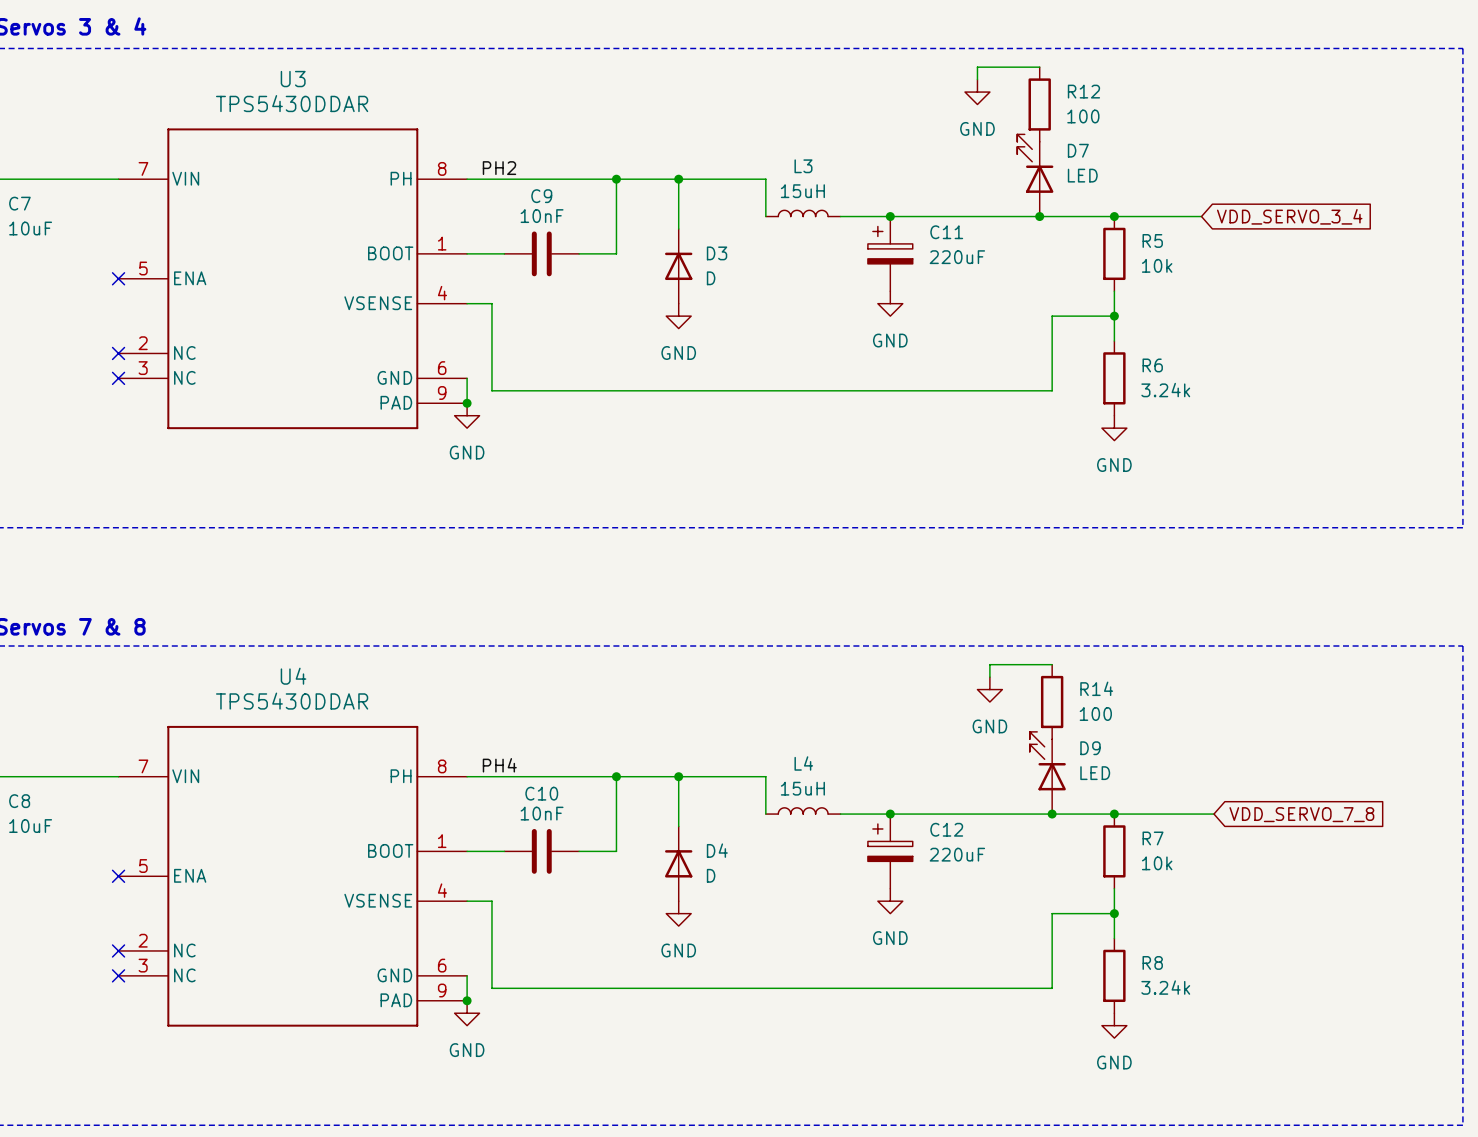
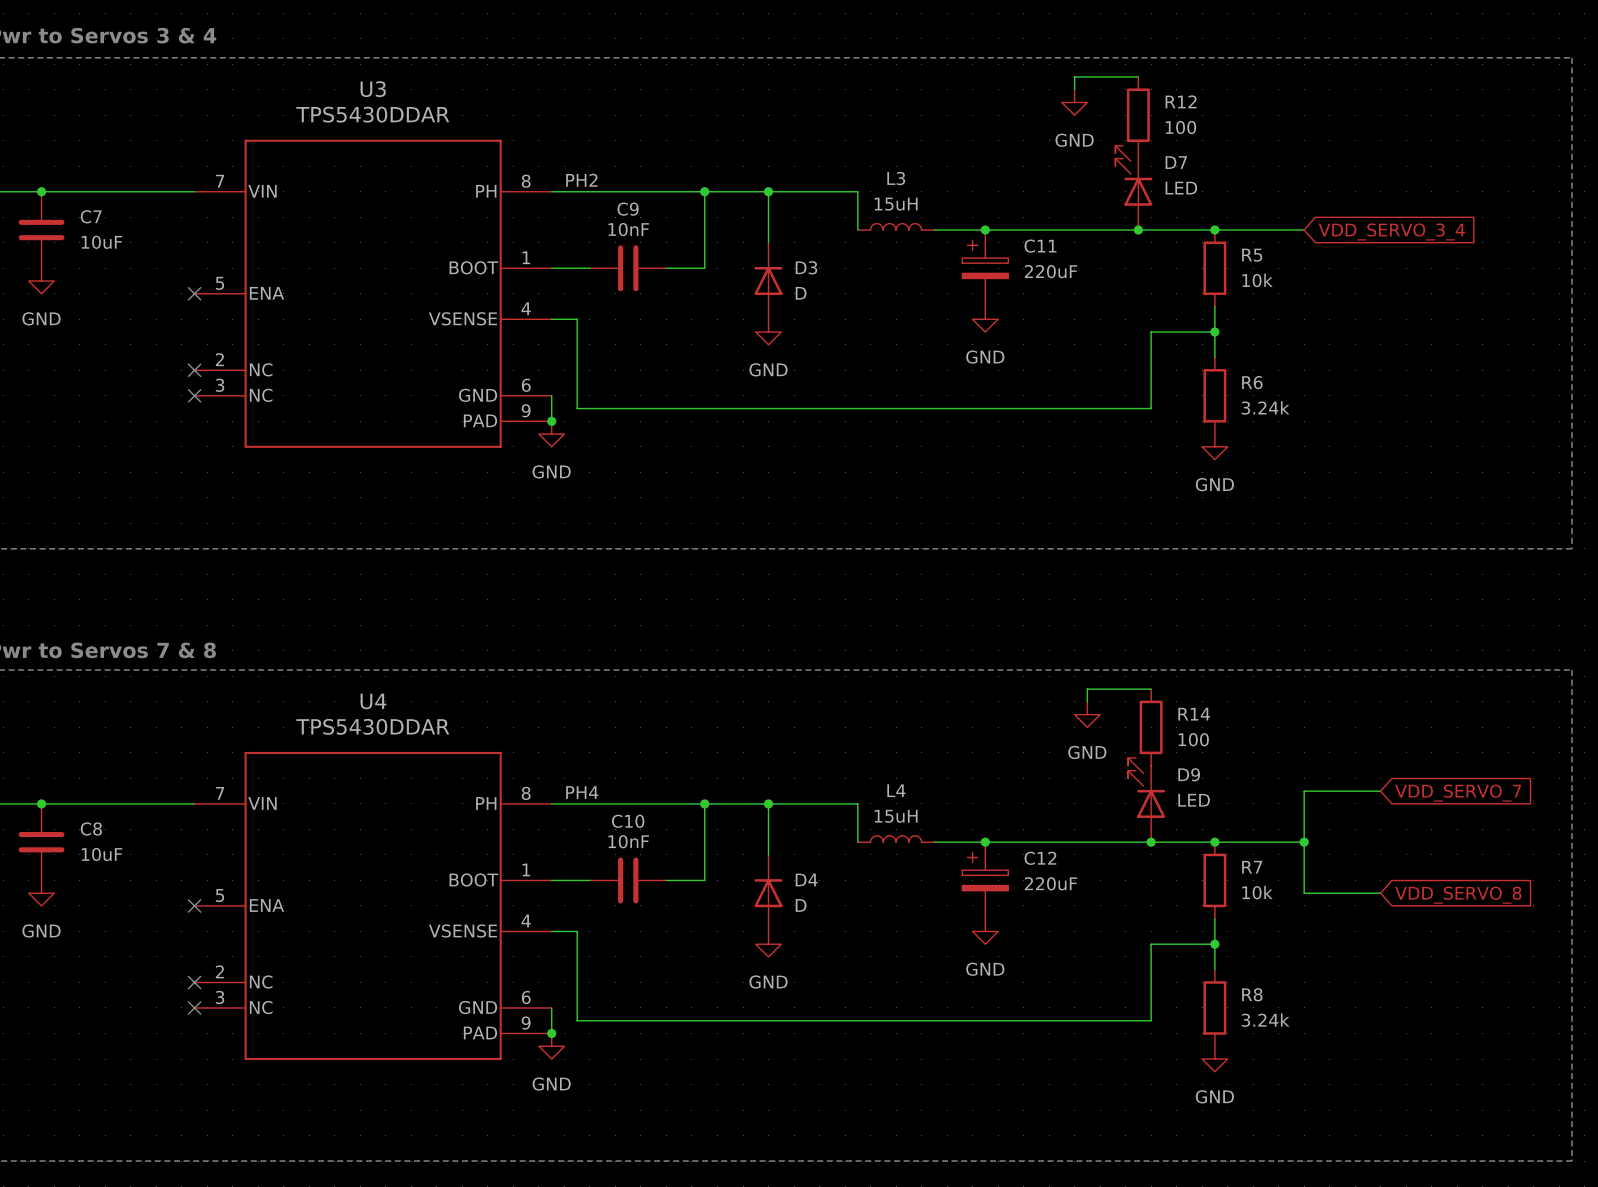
wire: none -> (1380, 791) (1304, 791) (1304, 893) (1380, 893)
global label: none -> VDD_SERVO_7 (1458, 793)
wire: (1201, 814) (1213, 814) -> none
junction: none -> (1304, 842)
global label: VDD_SERVO_7_8 (1301, 814) -> none
global label: none -> VDD_SERVO_8 (1458, 895)

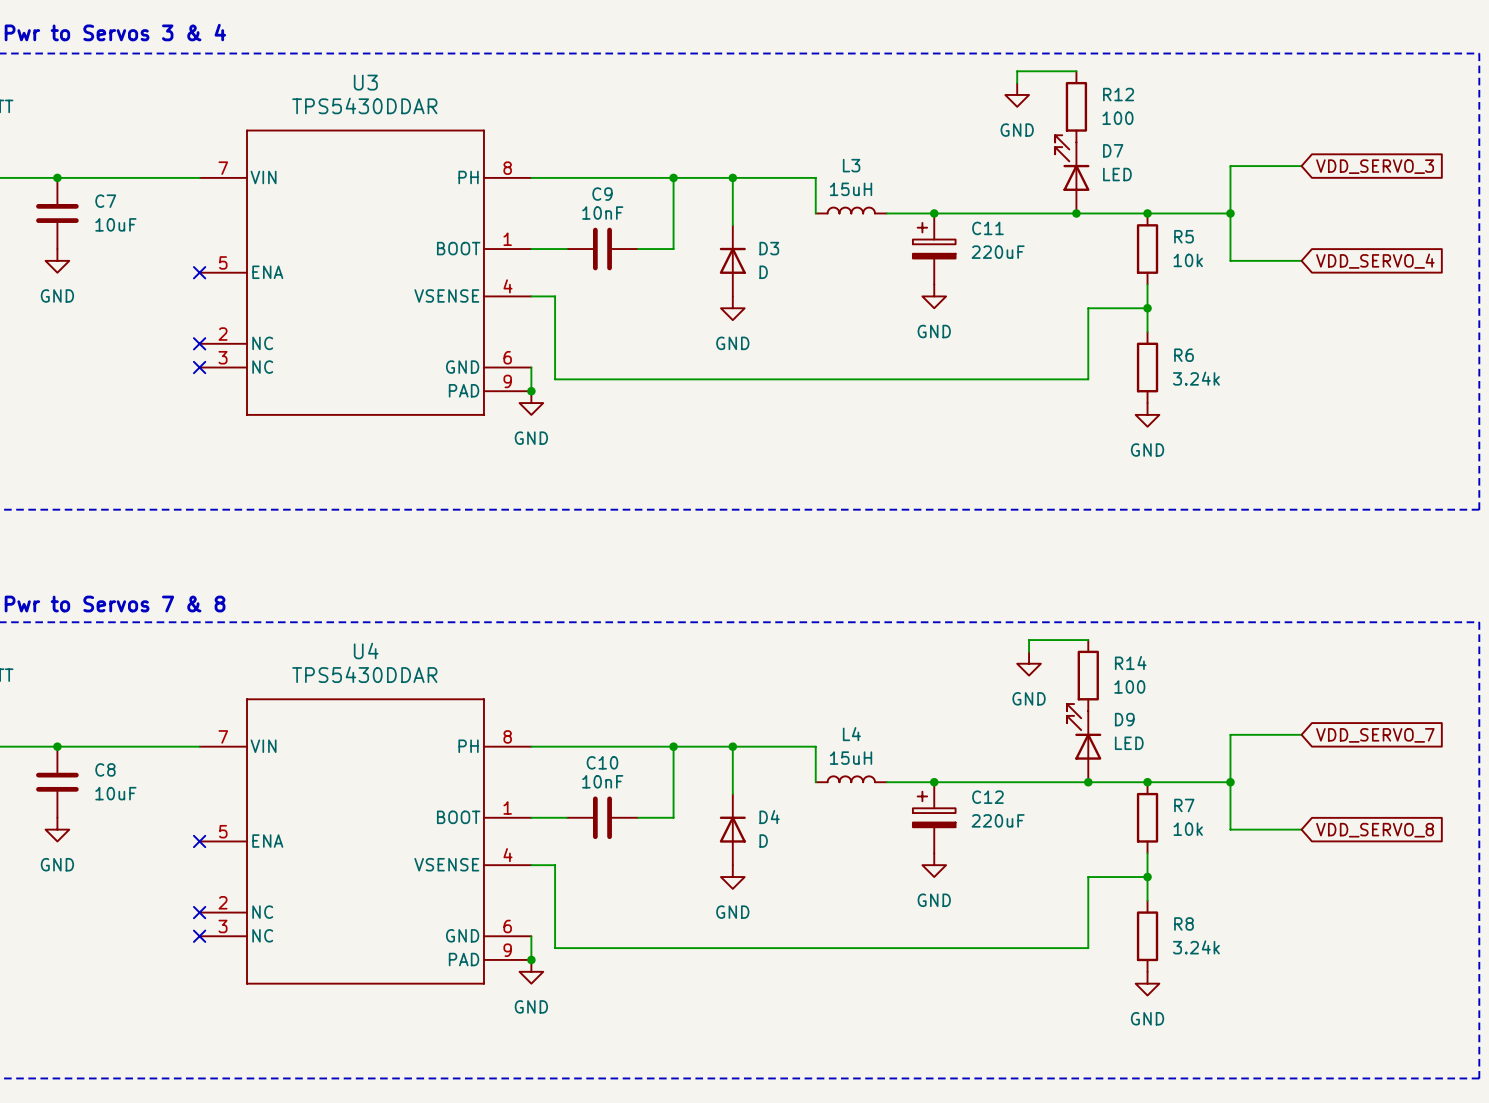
wire: none -> (1301, 166) (1230, 166) (1230, 260) (1301, 260)
label: PH2 (581, 180) -> none
global label: none -> VDD_SERVO_3 (1375, 166)
junction: none -> (1230, 213)
global label: VDD_SERVO_3_4 (1391, 231) -> none
global label: none -> VDD_SERVO_4 (1375, 261)
label: PH4 (582, 792) -> none

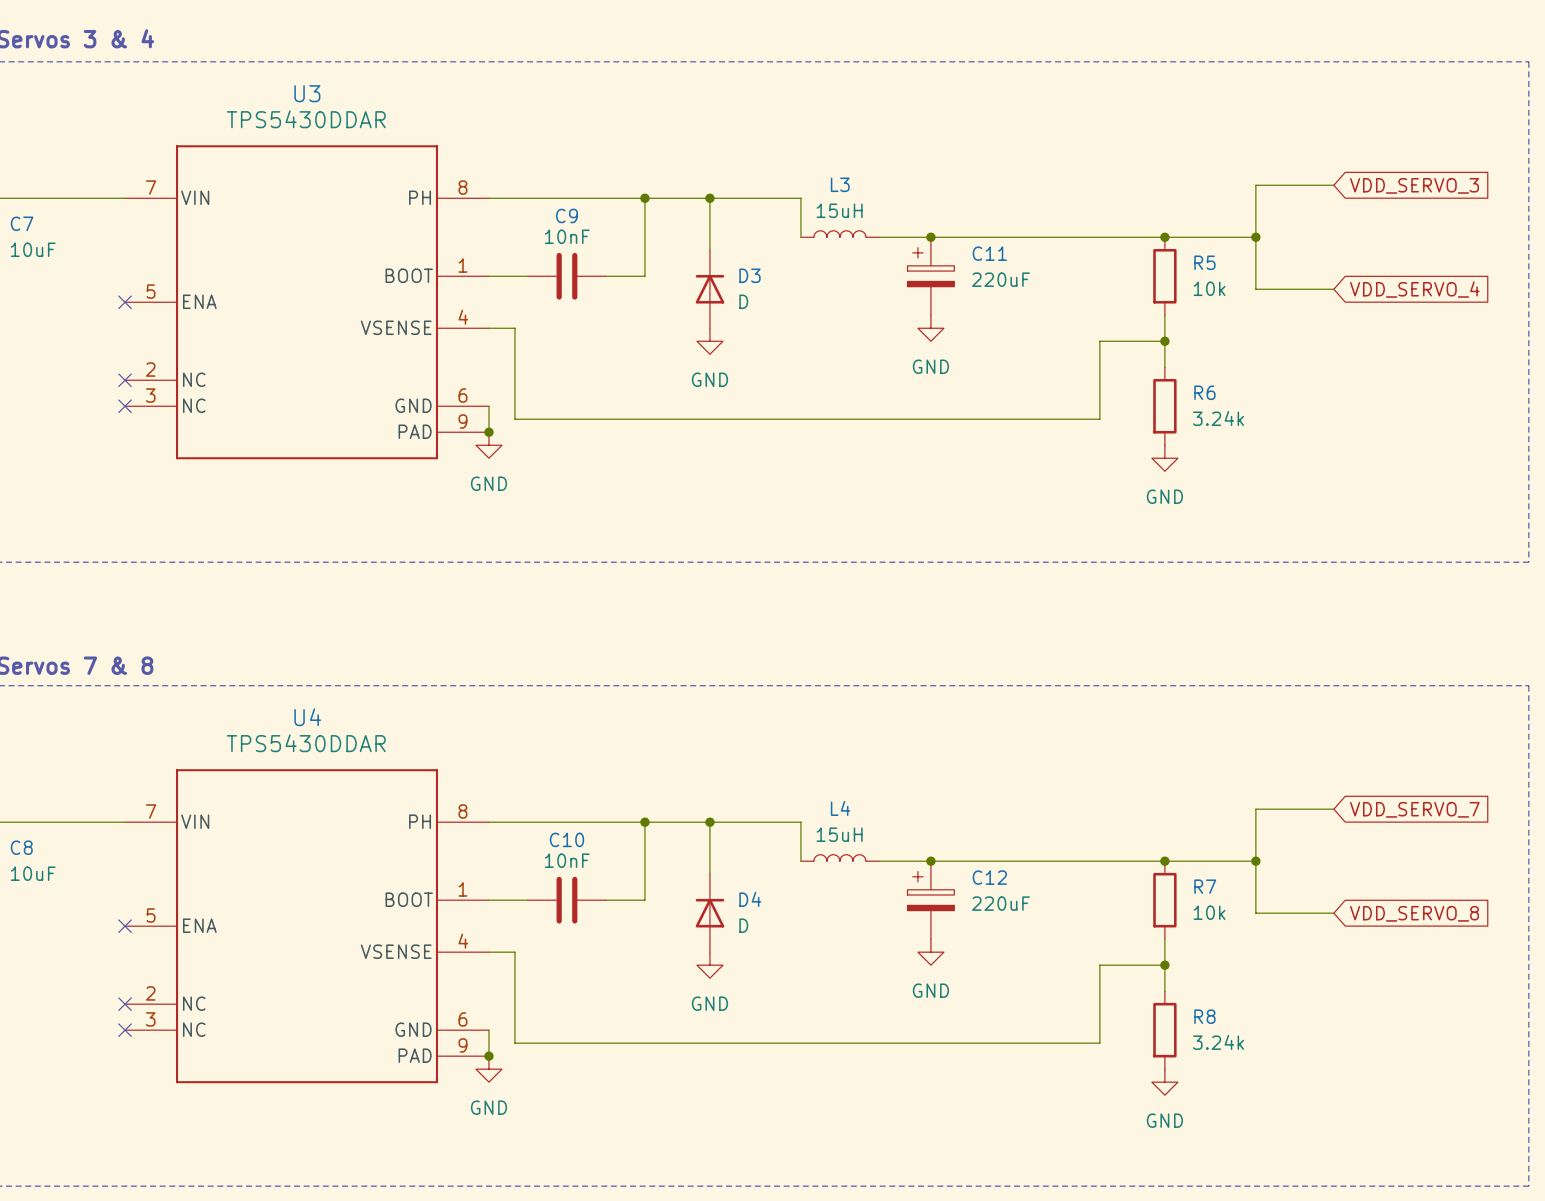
wire: (1076, 71) (1017, 71) (1017, 83) -> none
power symbol: GND (1017, 94) -> none
R12: 100 (1076, 106) -> none
D7: LED (1072, 174) -> none
junction: (1076, 213) -> none
wire: (1088, 640) (1029, 640) (1029, 651) -> none
power symbol: GND (1029, 663) -> none
R14: 100 (1088, 675) -> none
D9: LED (1084, 743) -> none
junction: (1088, 782) -> none

